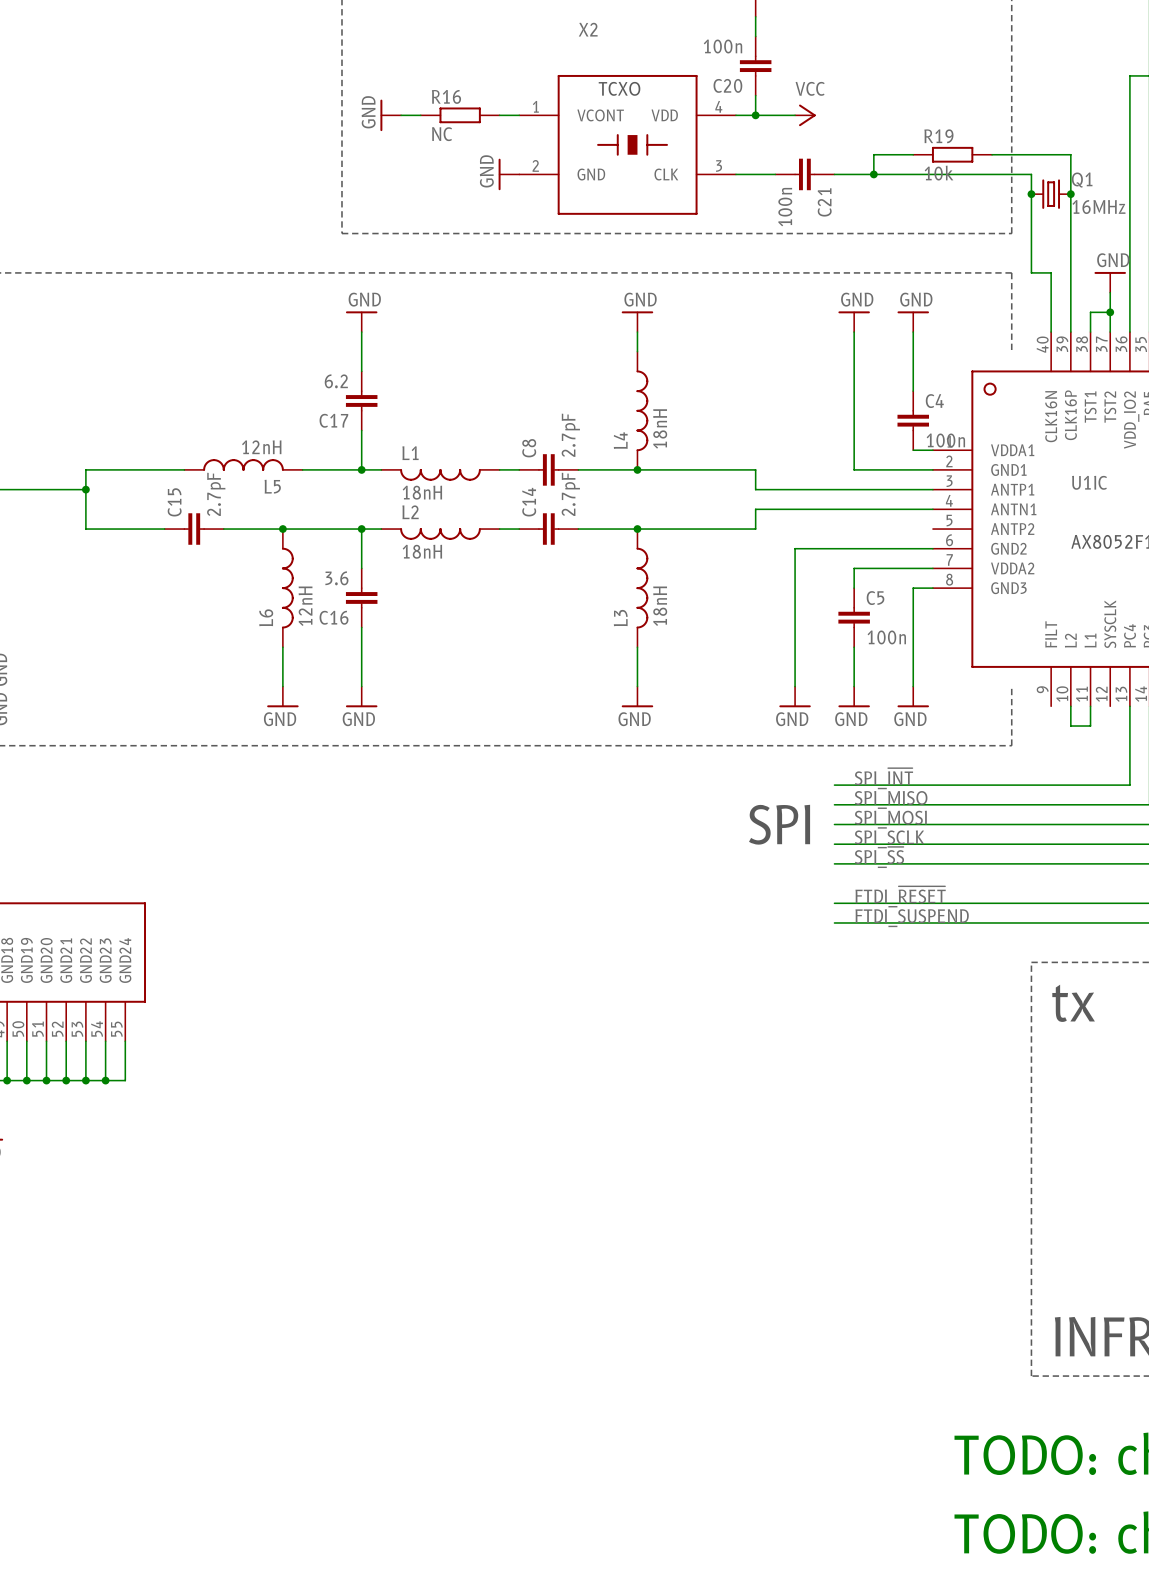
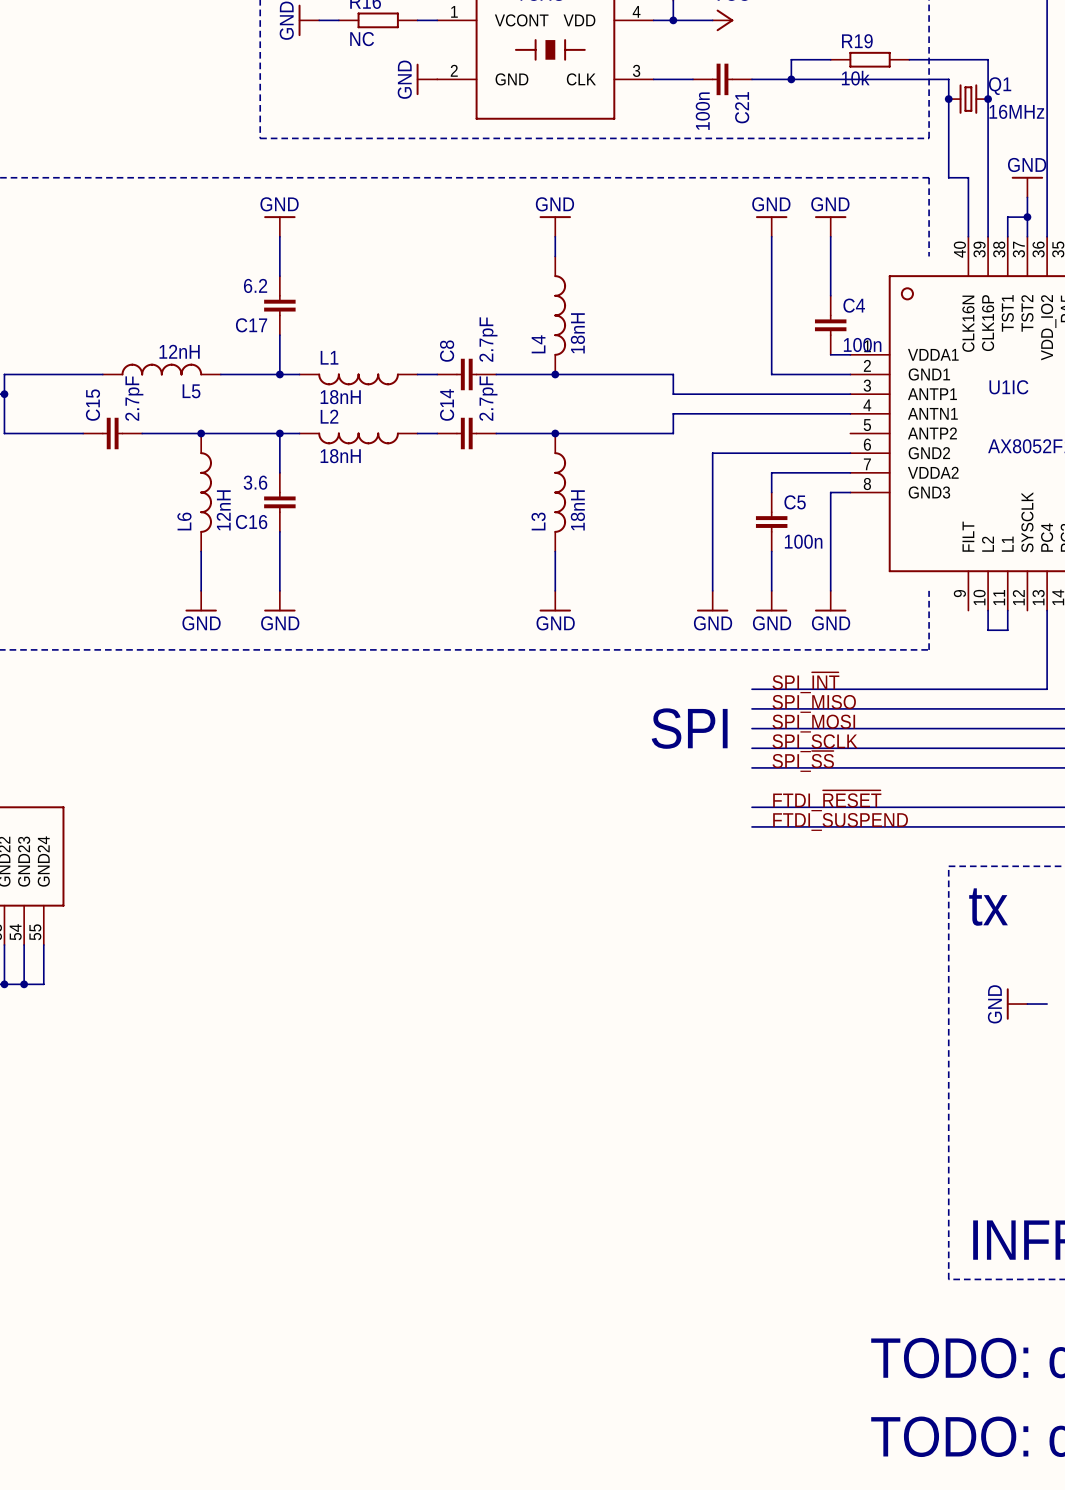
power symbol: none -> GND (1017, 1004)
wire: none -> (1027, 1004) (1047, 1004)

